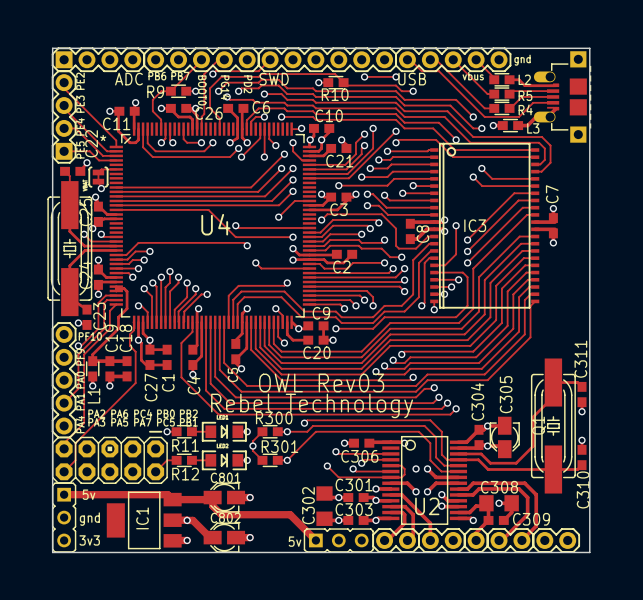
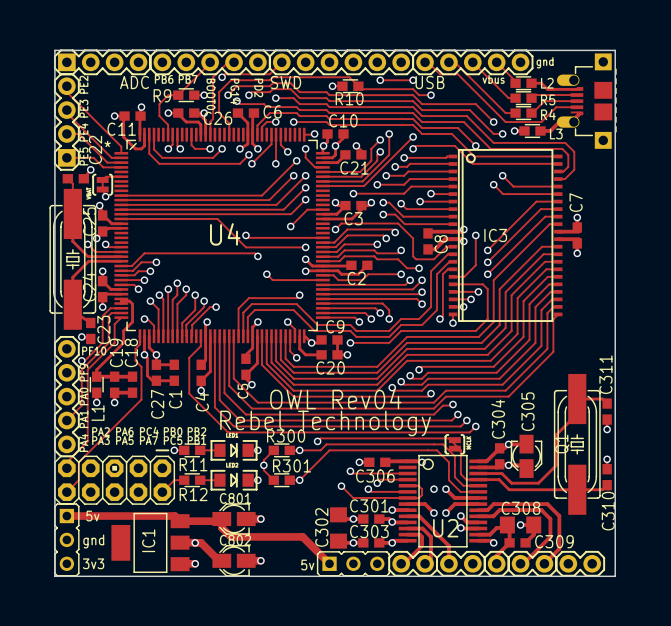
text: OWL Rev03 (321, 382) -> OWL Rev04 (335, 399)
part: none -> (454, 444)

